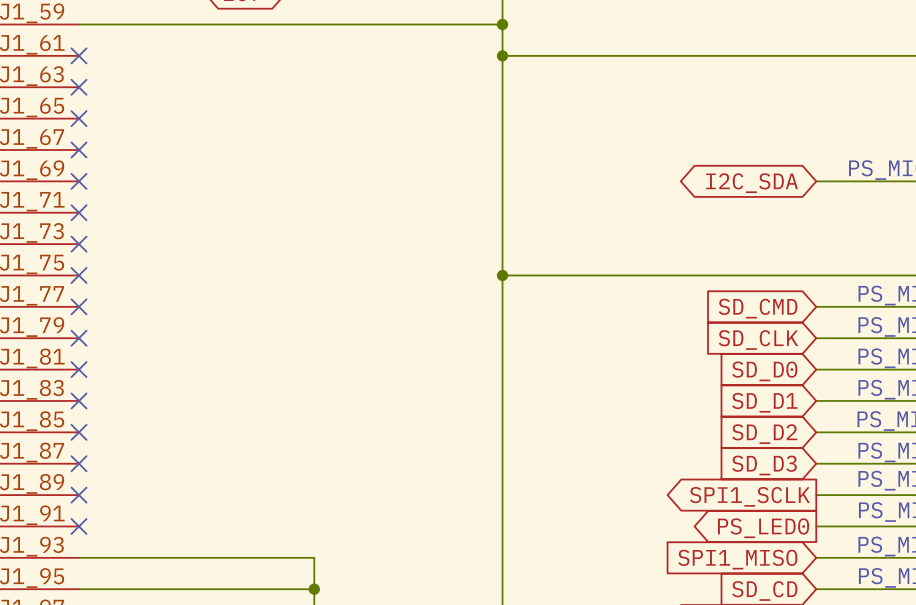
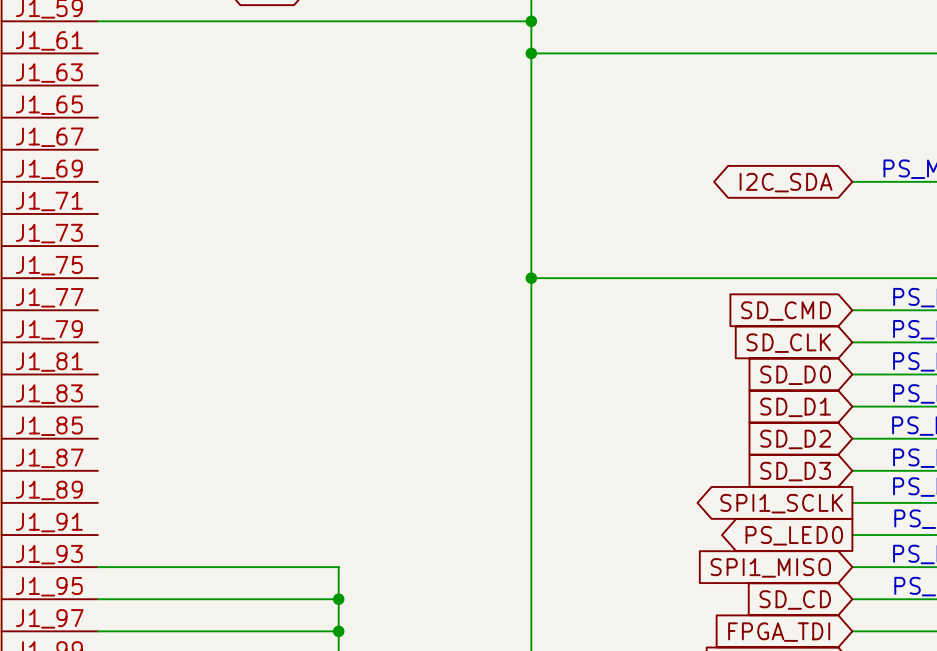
no-connect mark: (79, 55) -> none
no-connect mark: (79, 87) -> none
no-connect mark: (79, 118) -> none
no-connect mark: (79, 149) -> none
no-connect mark: (79, 181) -> none
no-connect mark: (79, 212) -> none
no-connect mark: (79, 244) -> none
no-connect mark: (79, 275) -> none
no-connect mark: (79, 306) -> none
no-connect mark: (79, 338) -> none
no-connect mark: (79, 369) -> none
no-connect mark: (79, 400) -> none
no-connect mark: (79, 432) -> none
no-connect mark: (79, 463) -> none
no-connect mark: (79, 495) -> none
no-connect mark: (79, 526) -> none

